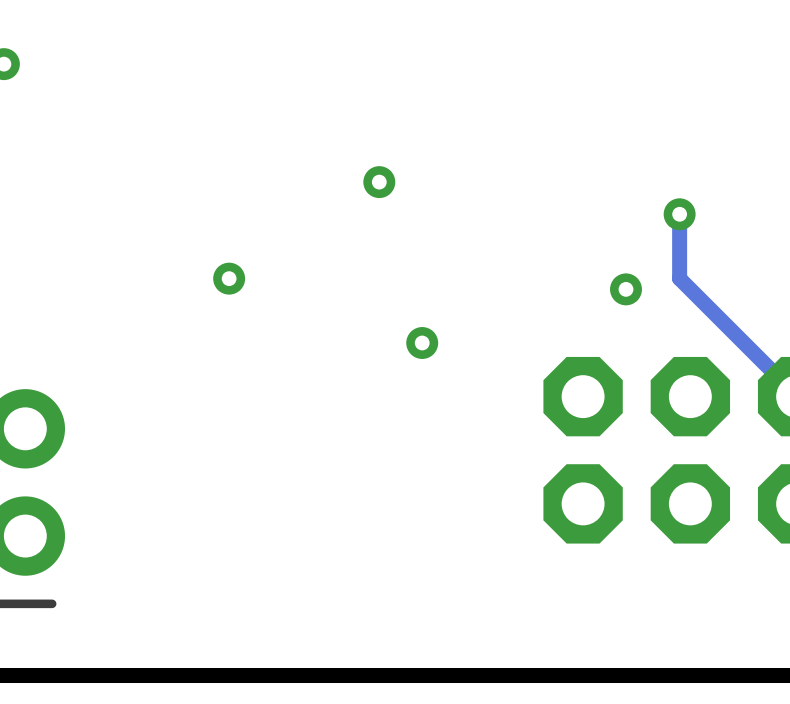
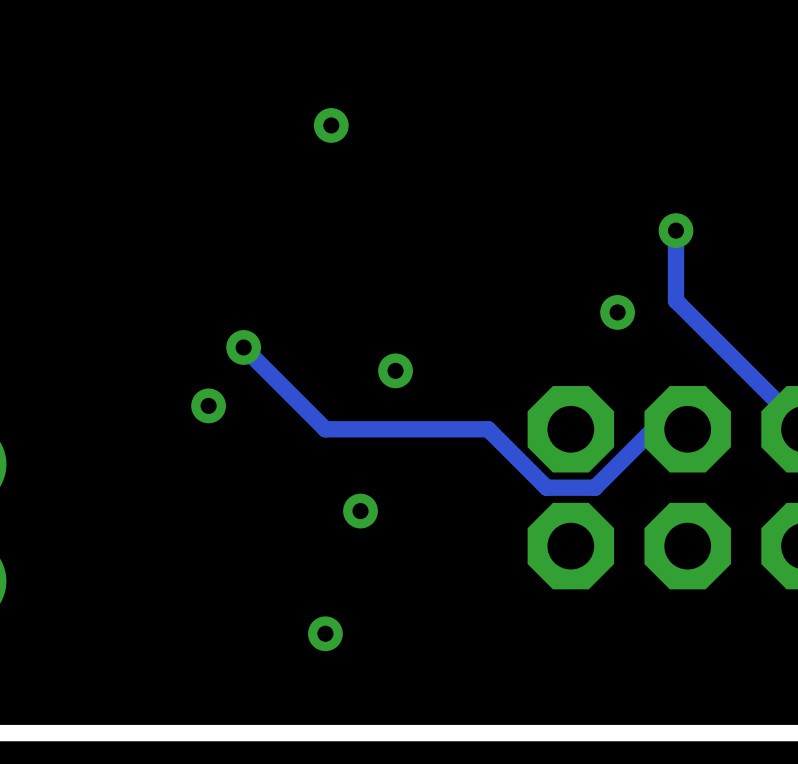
via position: (379, 182) -> (331, 125)
via: (229, 278) -> none
track: none -> (243, 347) (325, 429) (488, 429) (546, 487) (595, 487) (653, 429) (687, 429)
via: none -> (243, 347)
via: none -> (208, 405)
via: none -> (360, 511)
via: none -> (325, 633)

